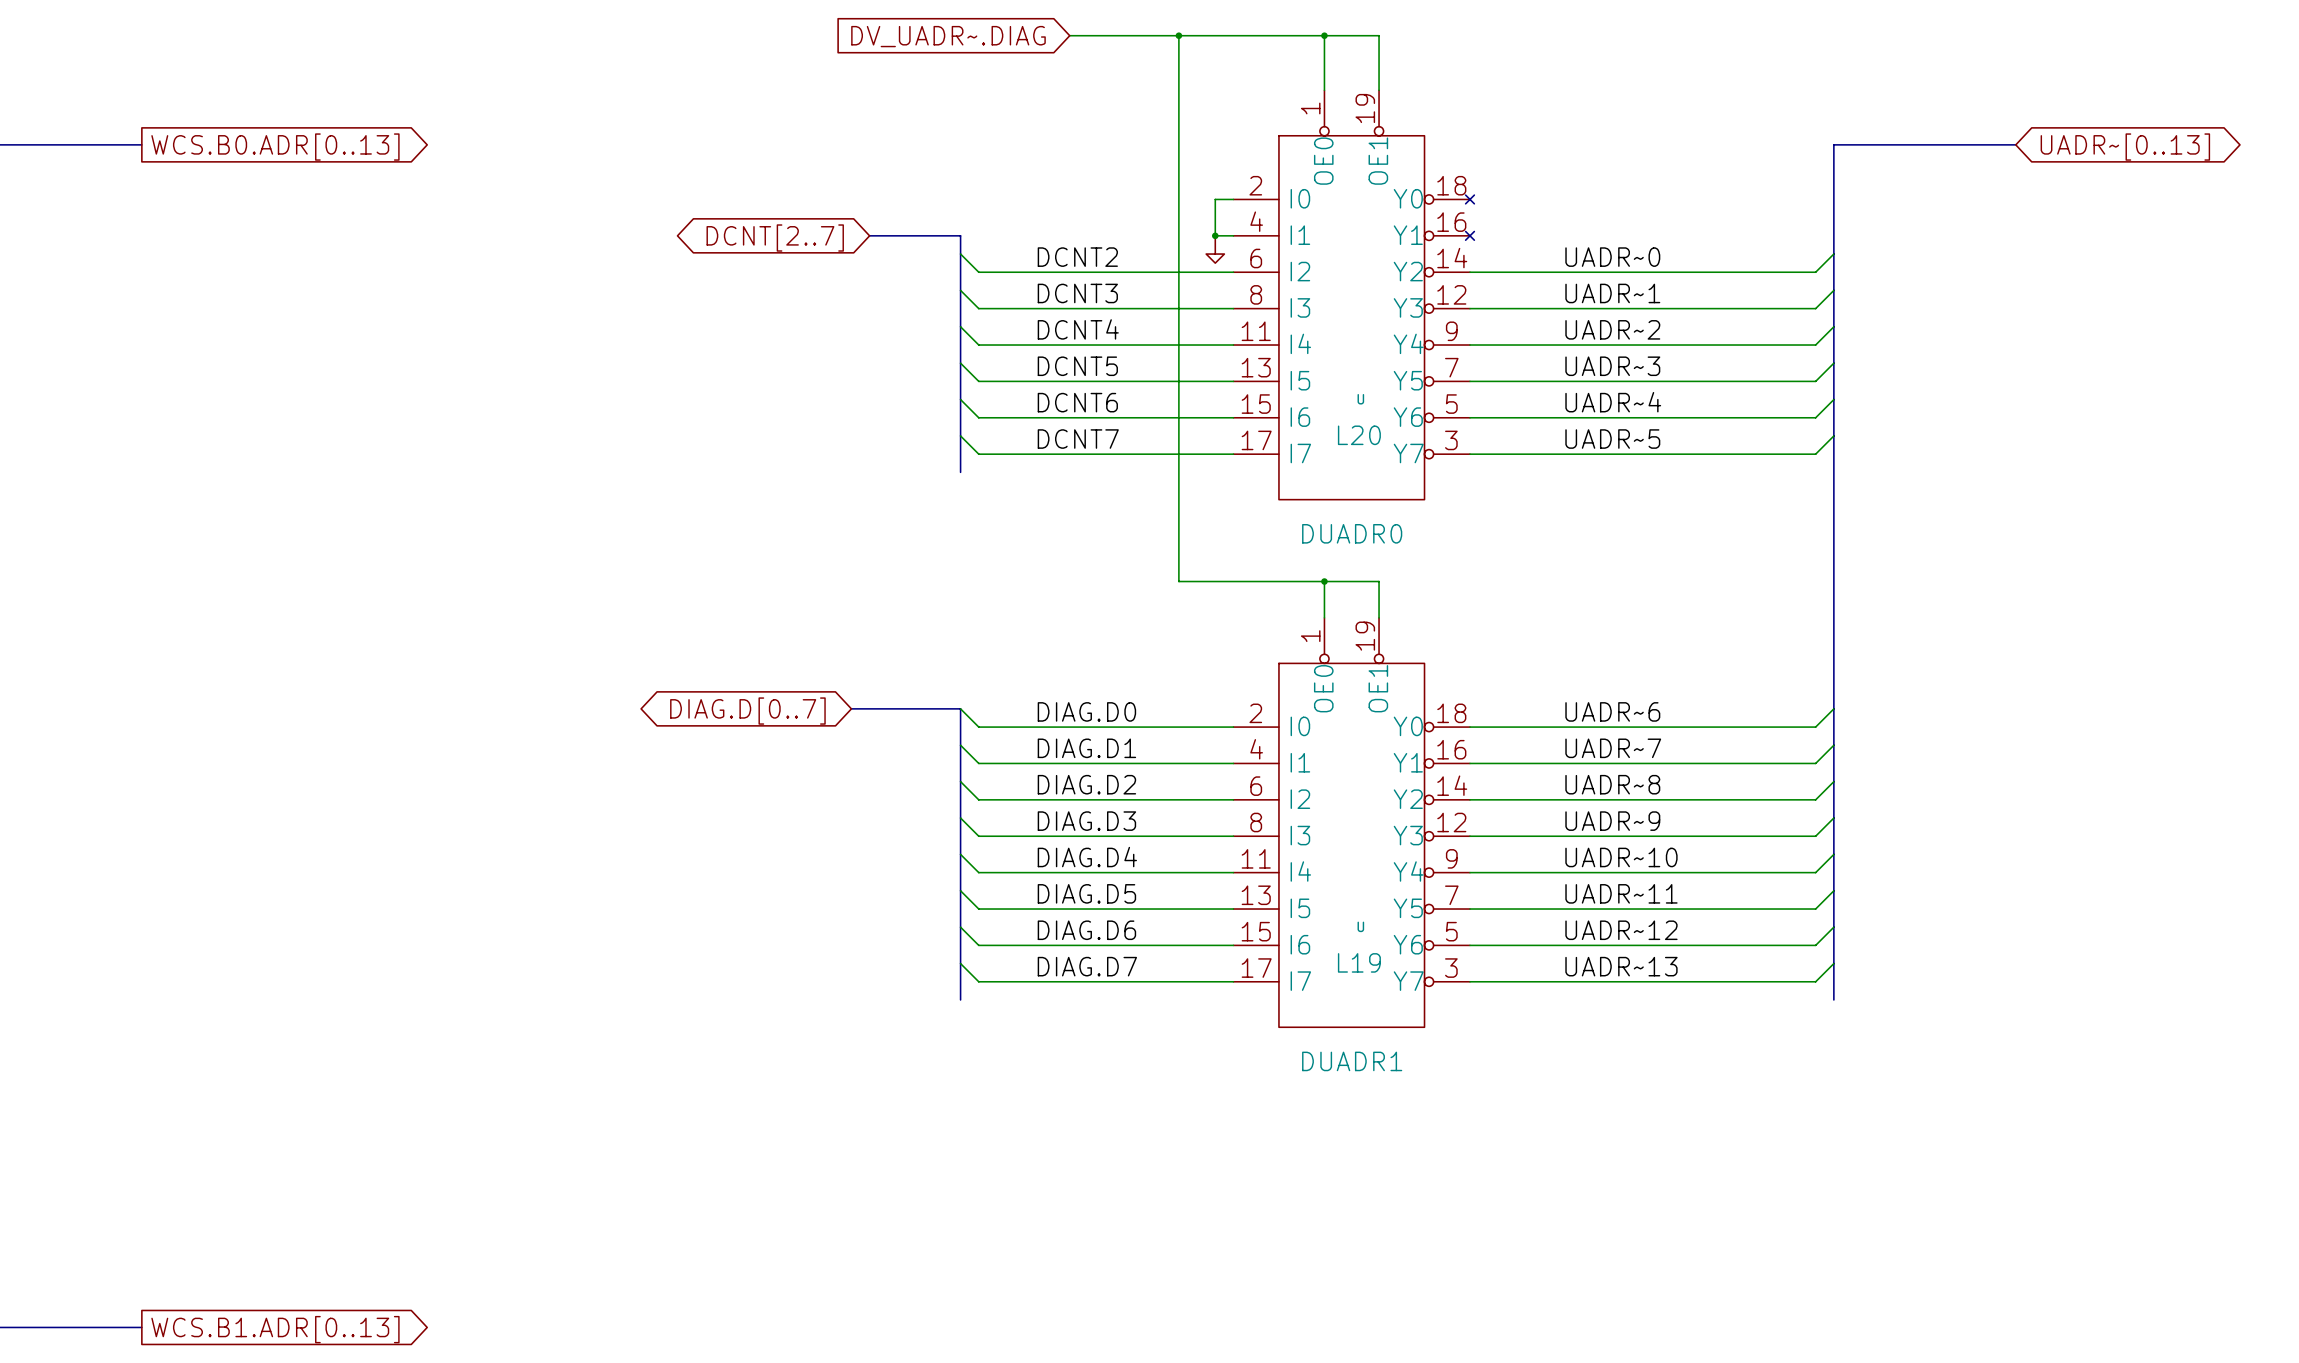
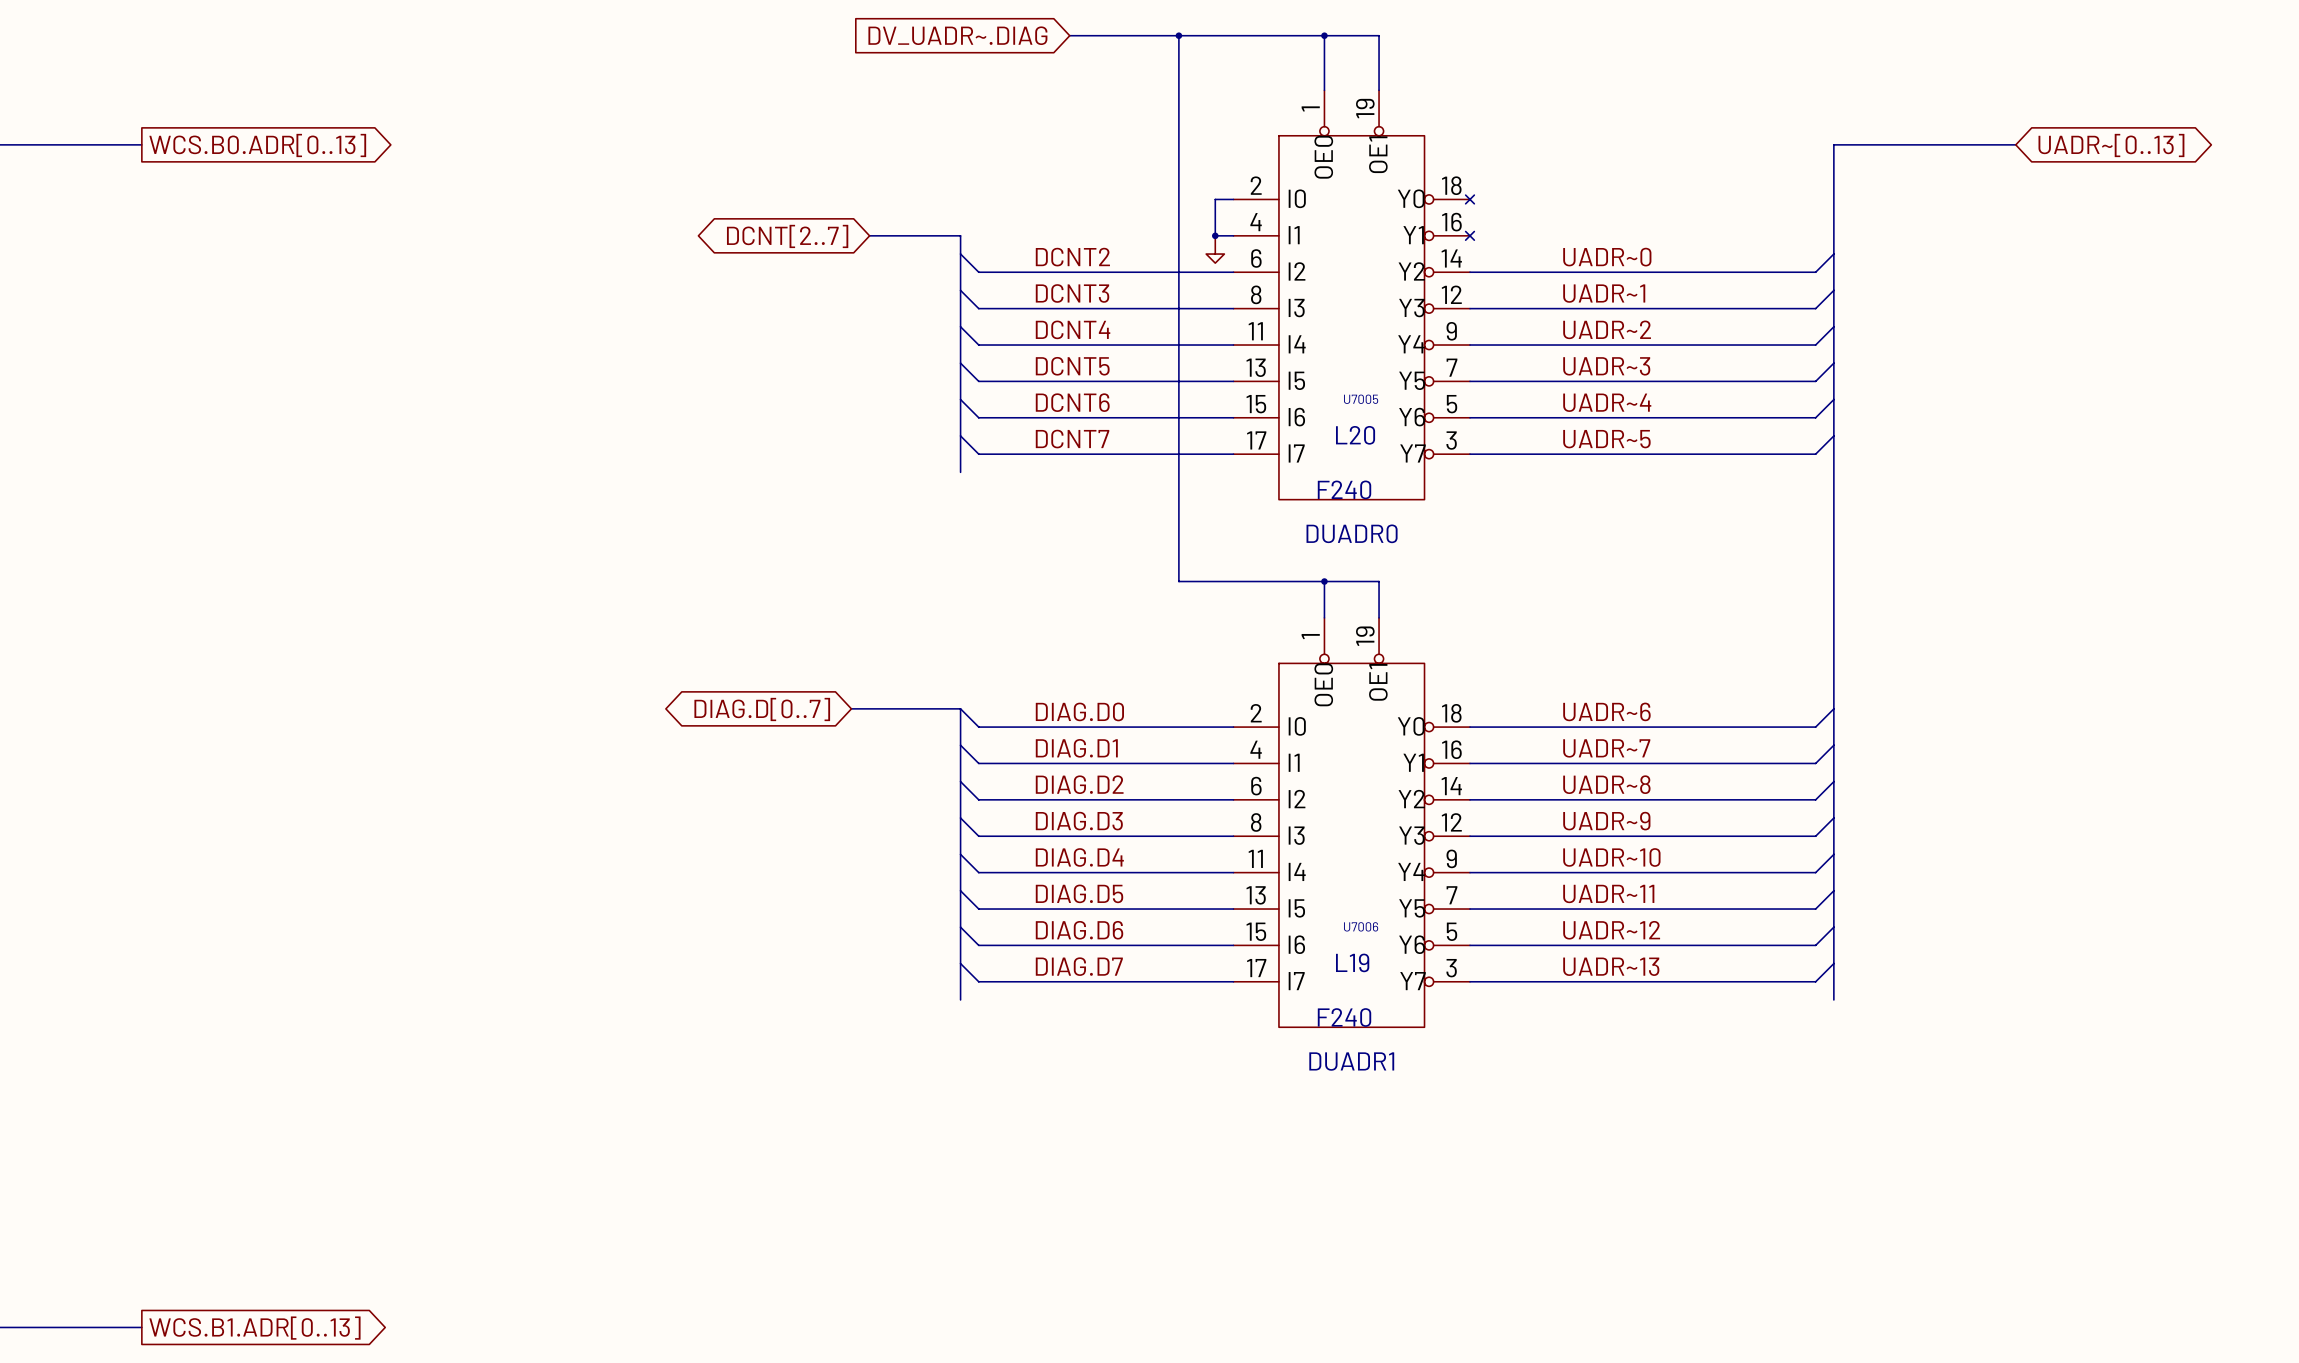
U name: U (1360, 399) -> U7005 (1361, 399)
U value: none -> F240 (1344, 489)
U name: U (1360, 926) -> U7006 (1361, 926)
U value: none -> F240 (1344, 1017)

